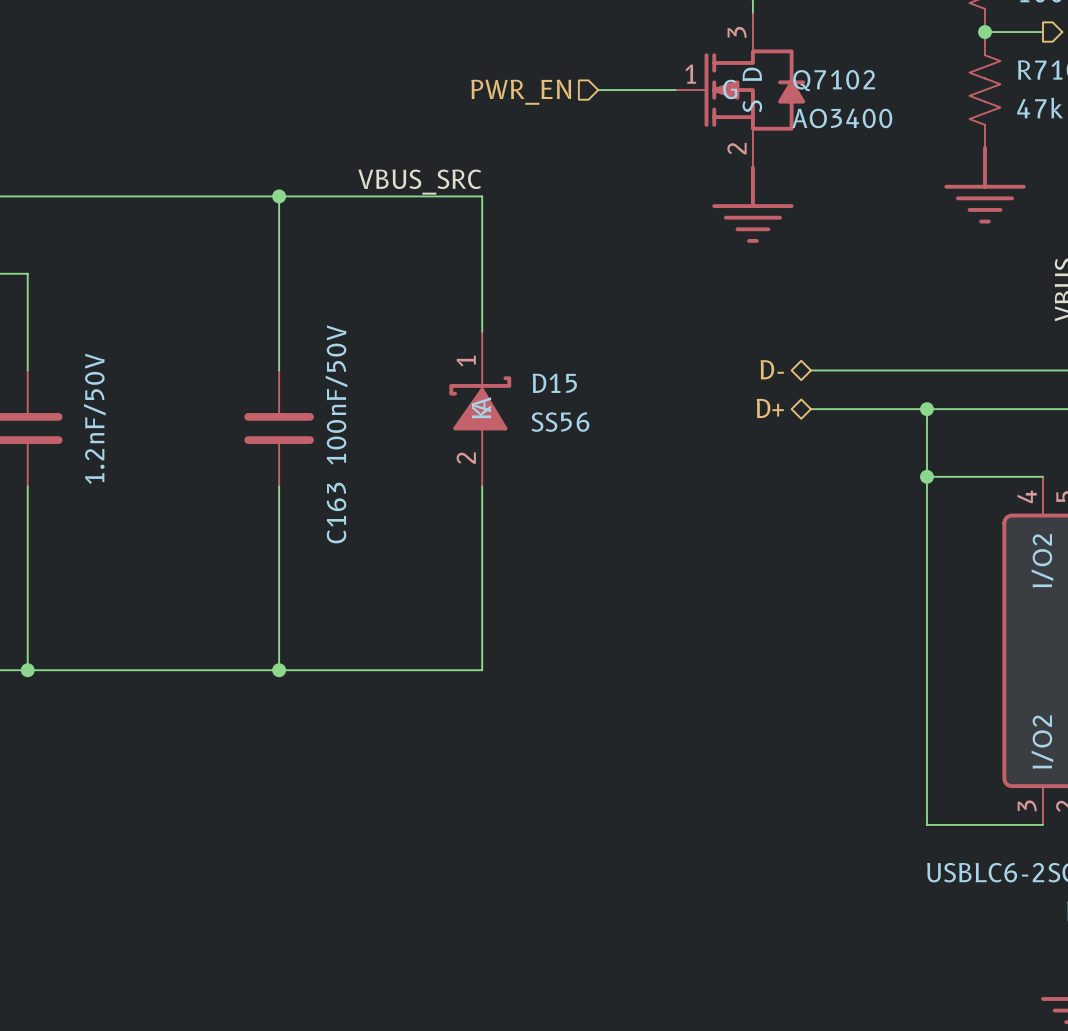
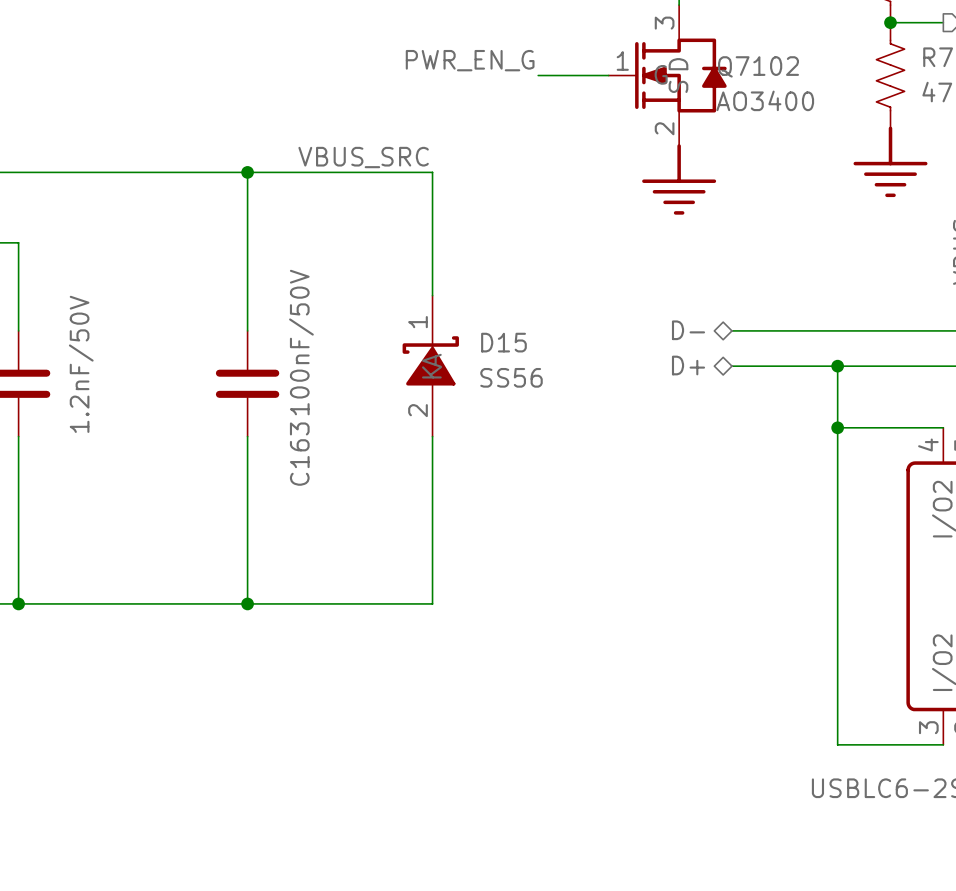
label: none -> PWR_EN_G (470, 60)
hierarchical label: PWR_EN (521, 92) -> none

